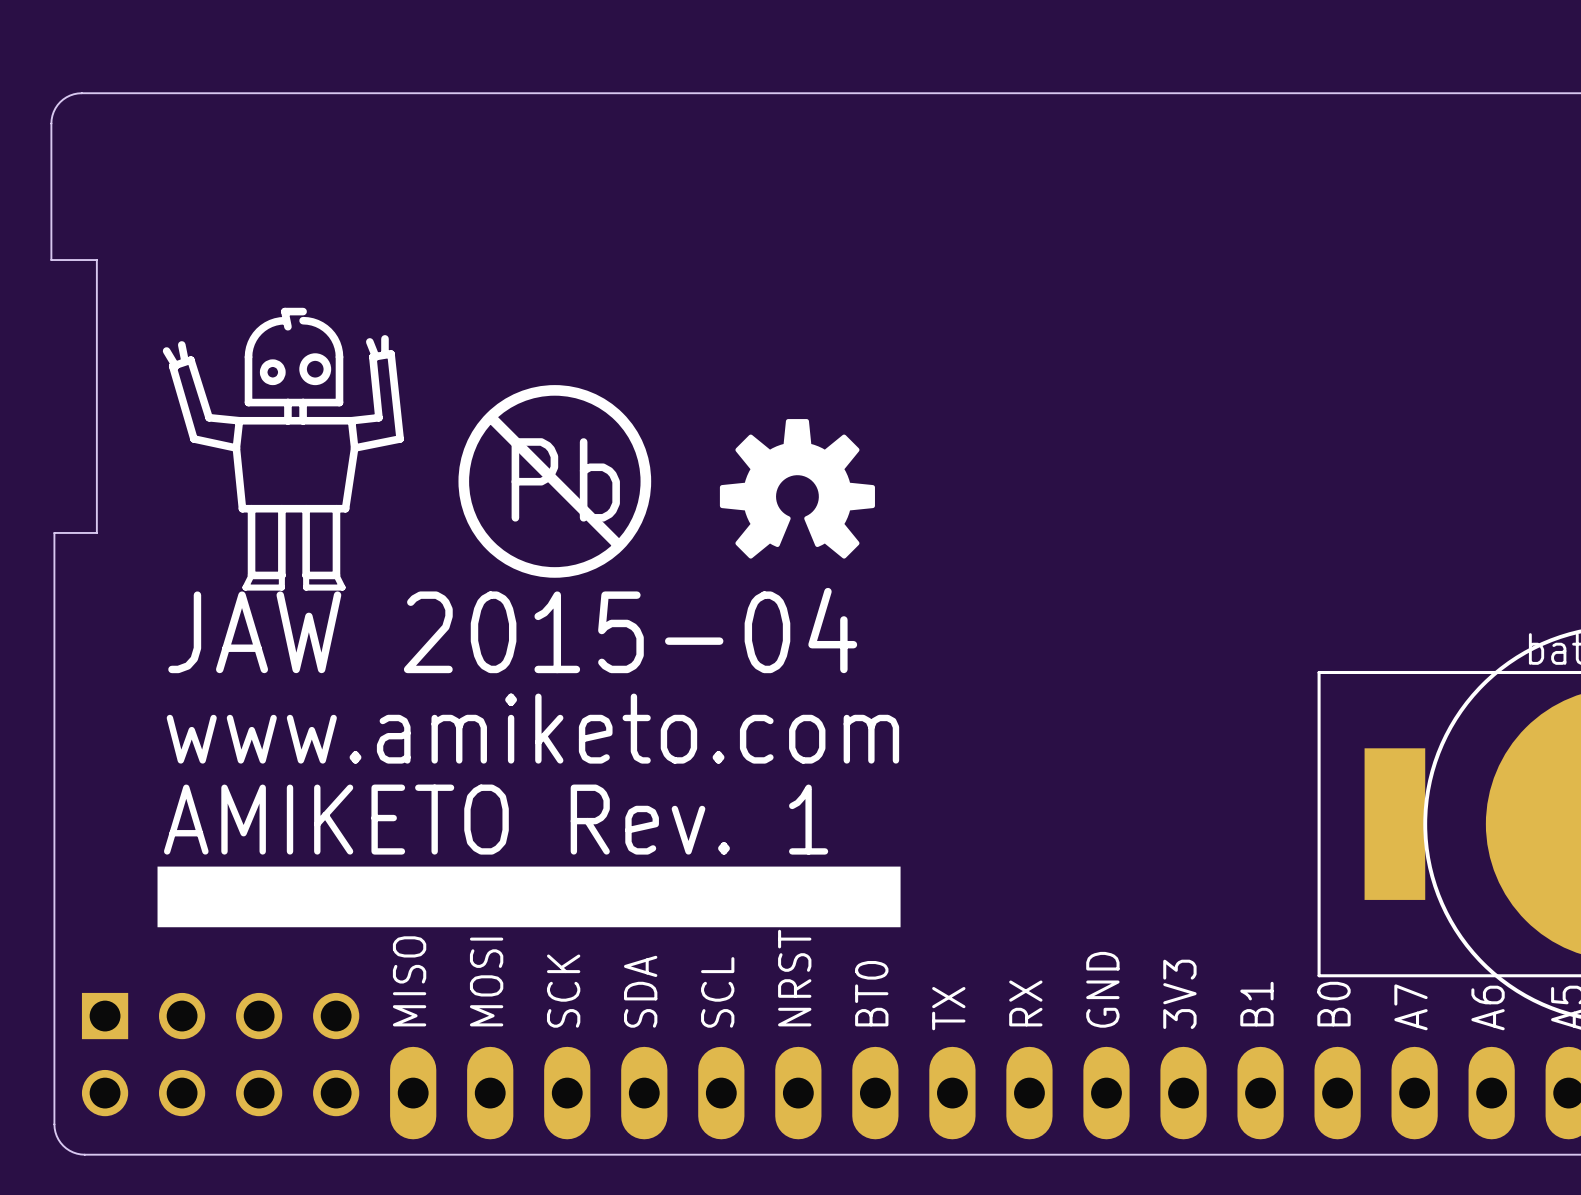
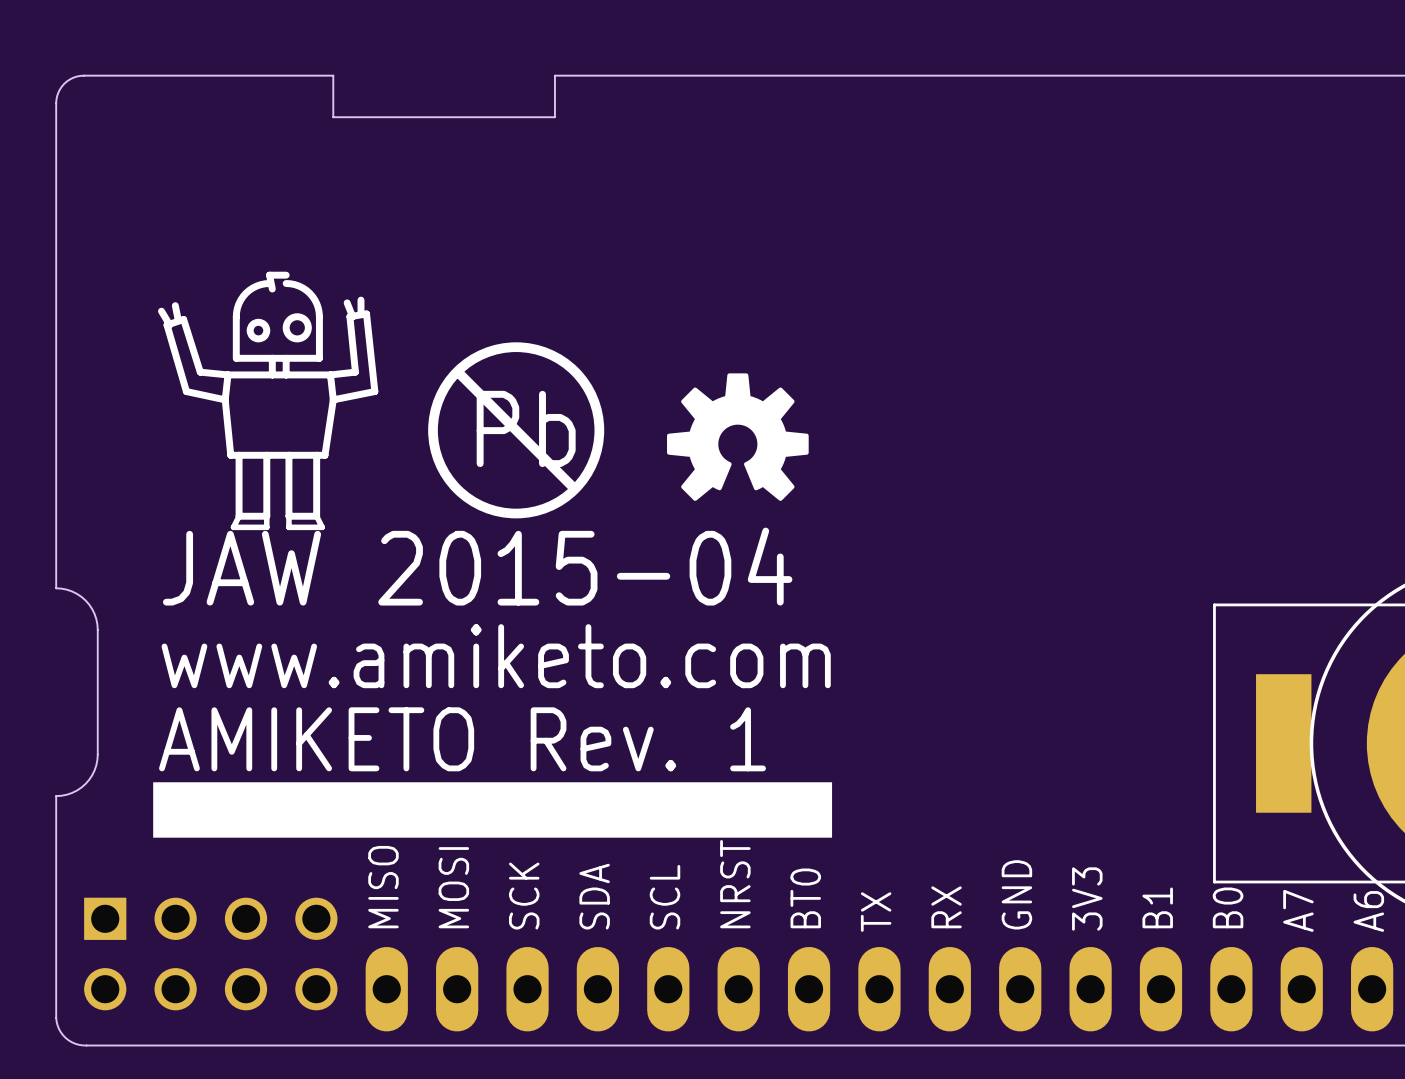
board edge: (597, 93) (354, 93) -> (554, 75) (554, 117) (333, 117) (333, 75)
board edge: (51, 260) (96, 260) (96, 532) (54, 532) (54, 1124) (56, 1135) (63, 1145) (73, 1152) (84, 1154) -> (56, 228) (56, 588) (72, 591) (85, 600) (94, 613) (97, 629) (96, 765) (92, 775) (81, 787) (66, 794) (56, 796) (56, 1017) (58, 1028) (65, 1037) (75, 1043) (86, 1045)

